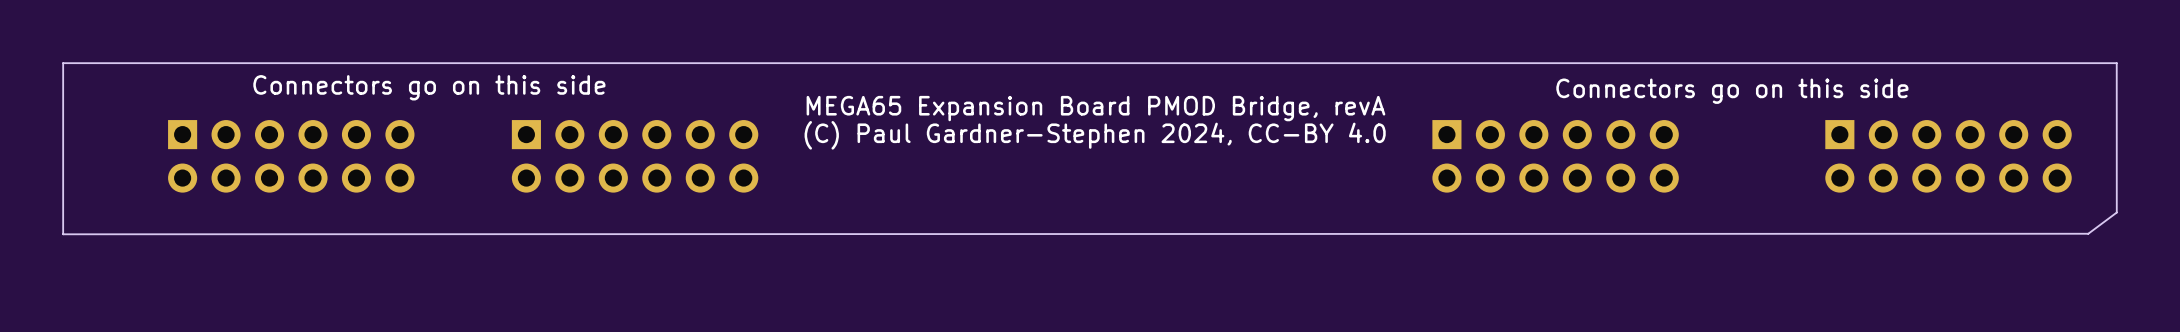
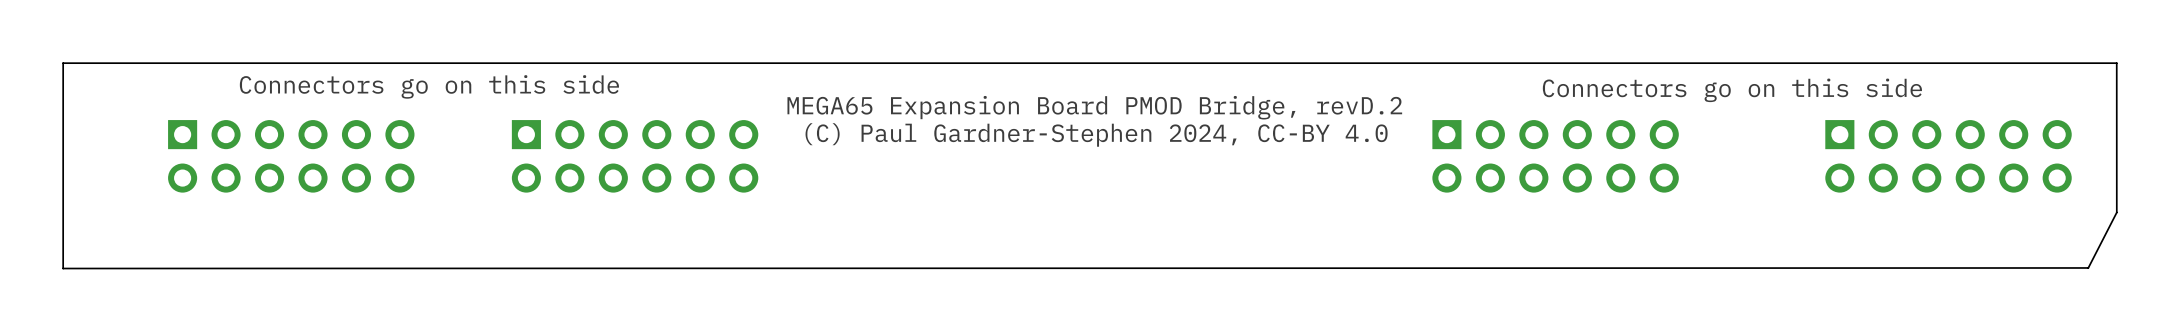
text: MEGA65 Expansion Board PMOD Bridge, revA (1095, 108) -> MEGA65 Expansion Board PMOD Bridge, revD.2 (1094, 107)
board edge: (2116, 212) (2088, 233) (63, 234) -> (2116, 212) (2088, 267) (63, 268) (63, 234)

